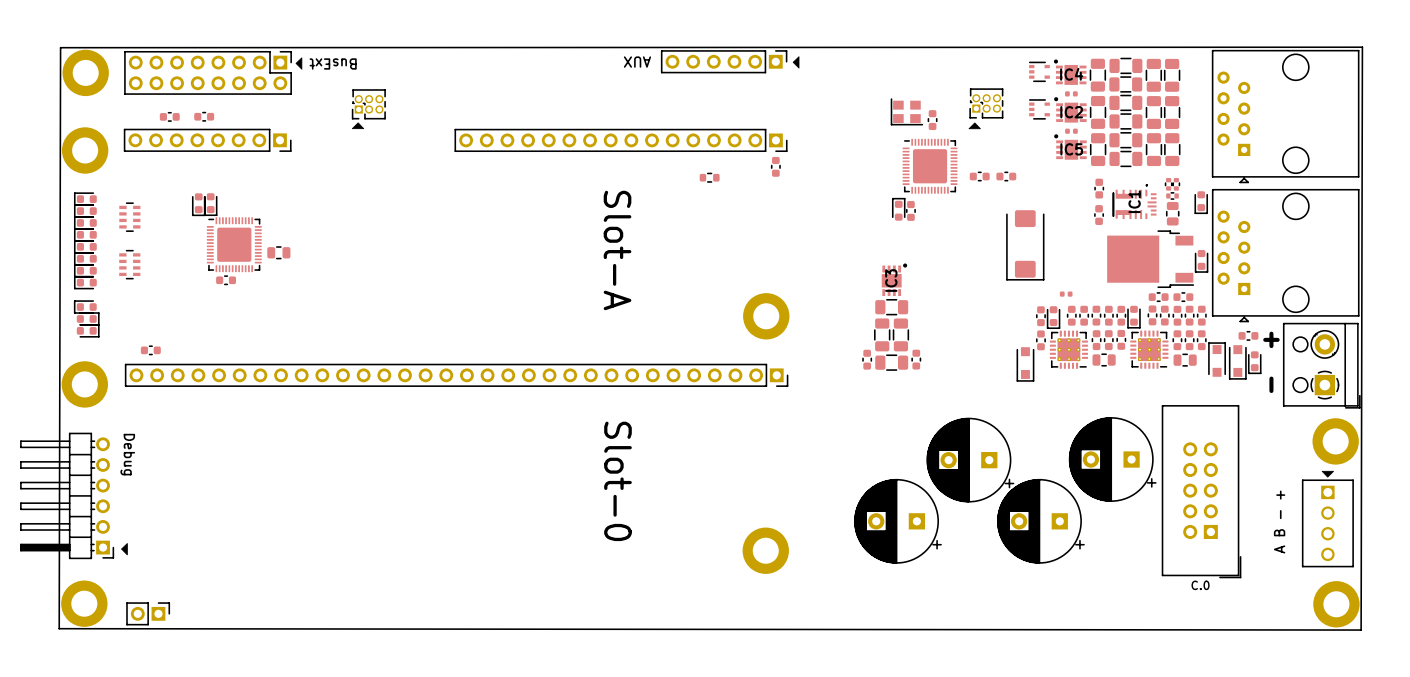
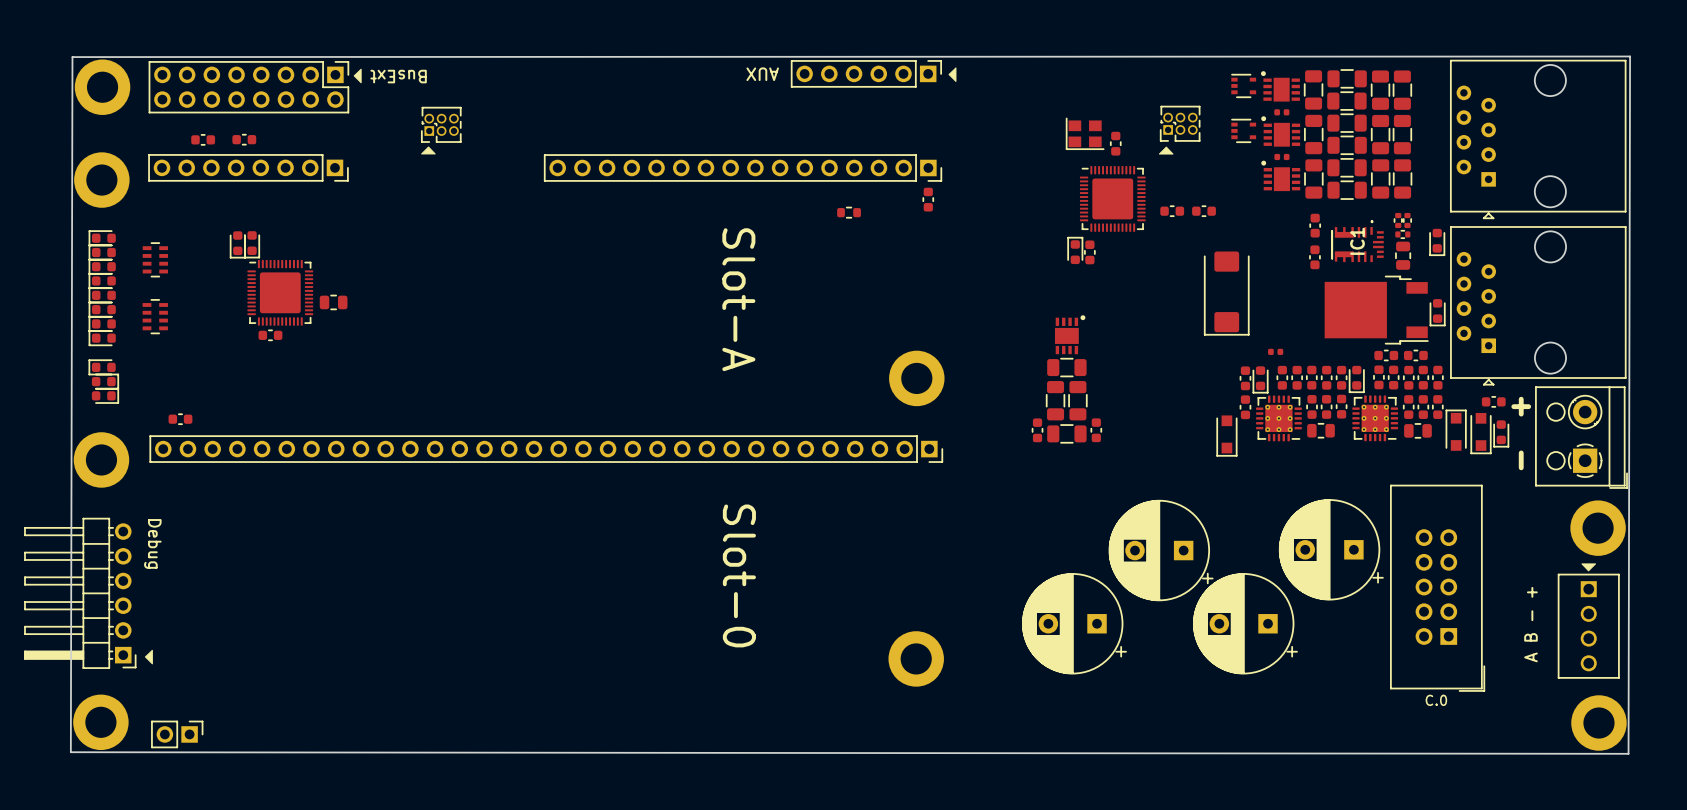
IC4 name: IC4 (1071, 74) -> none
IC2 name: IC2 (1071, 112) -> none
IC5 name: IC5 (1071, 149) -> none
IC3 name: IC3 (891, 280) -> none

